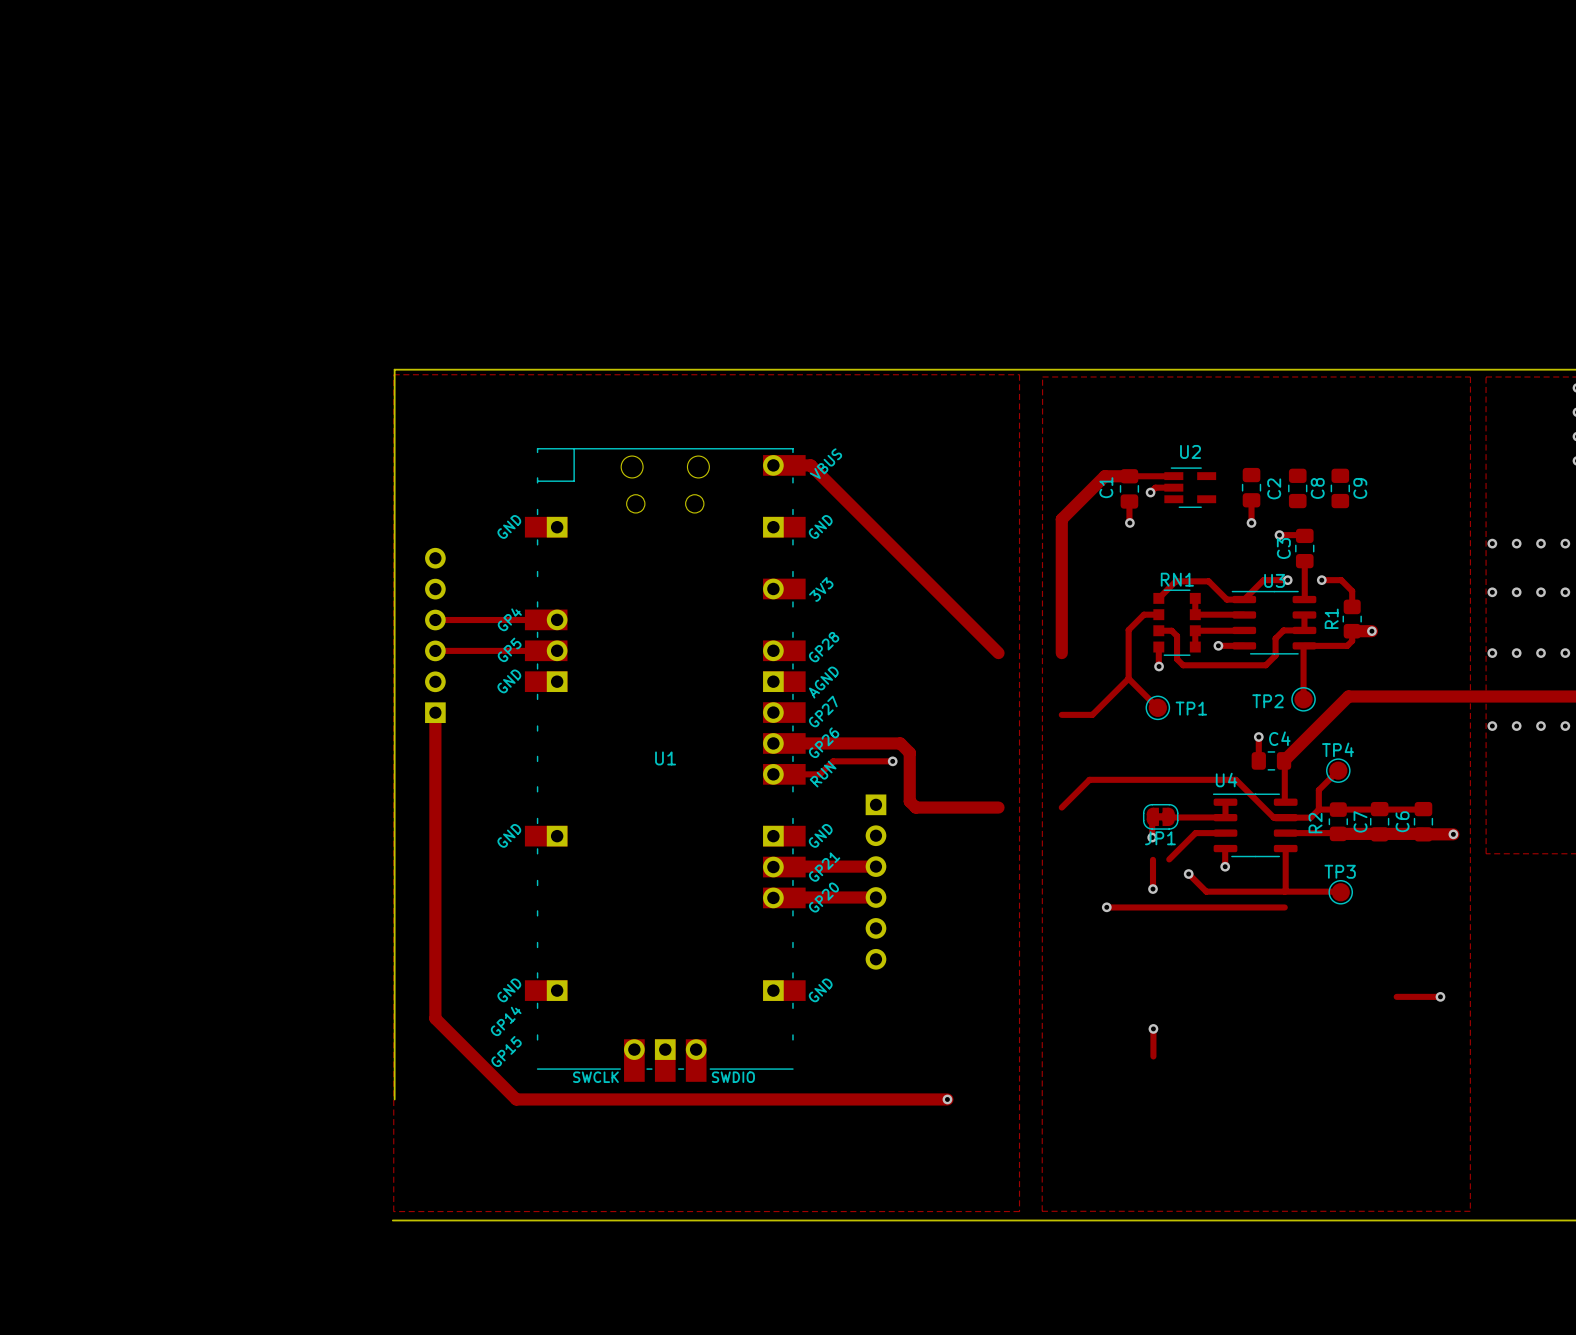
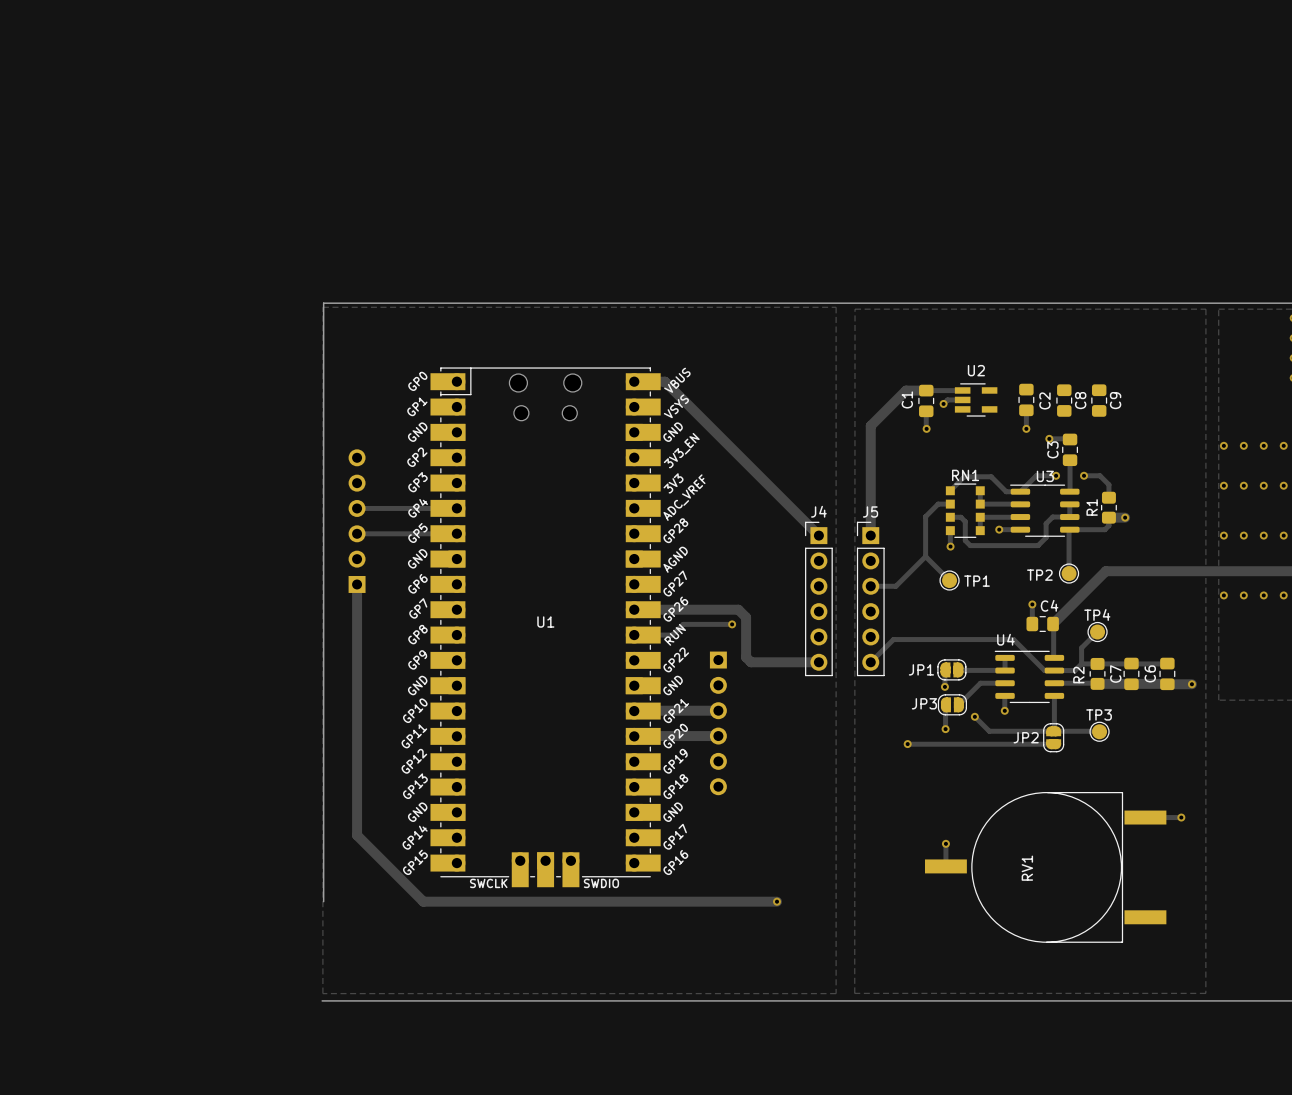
U1 footprint: [524, 448, 806, 1082] -> [430, 367, 661, 888]
J4: none -> (818, 598)
J5: none -> (870, 598)
JP1 footprint: [1142, 803, 1179, 830] -> [937, 659, 967, 681]
JP1 name position: JP1 (1160, 838) -> JP1 (921, 669)
JP3: none -> (952, 704)
JP2: none -> (1053, 737)
RV1: none -> (1045, 867)

